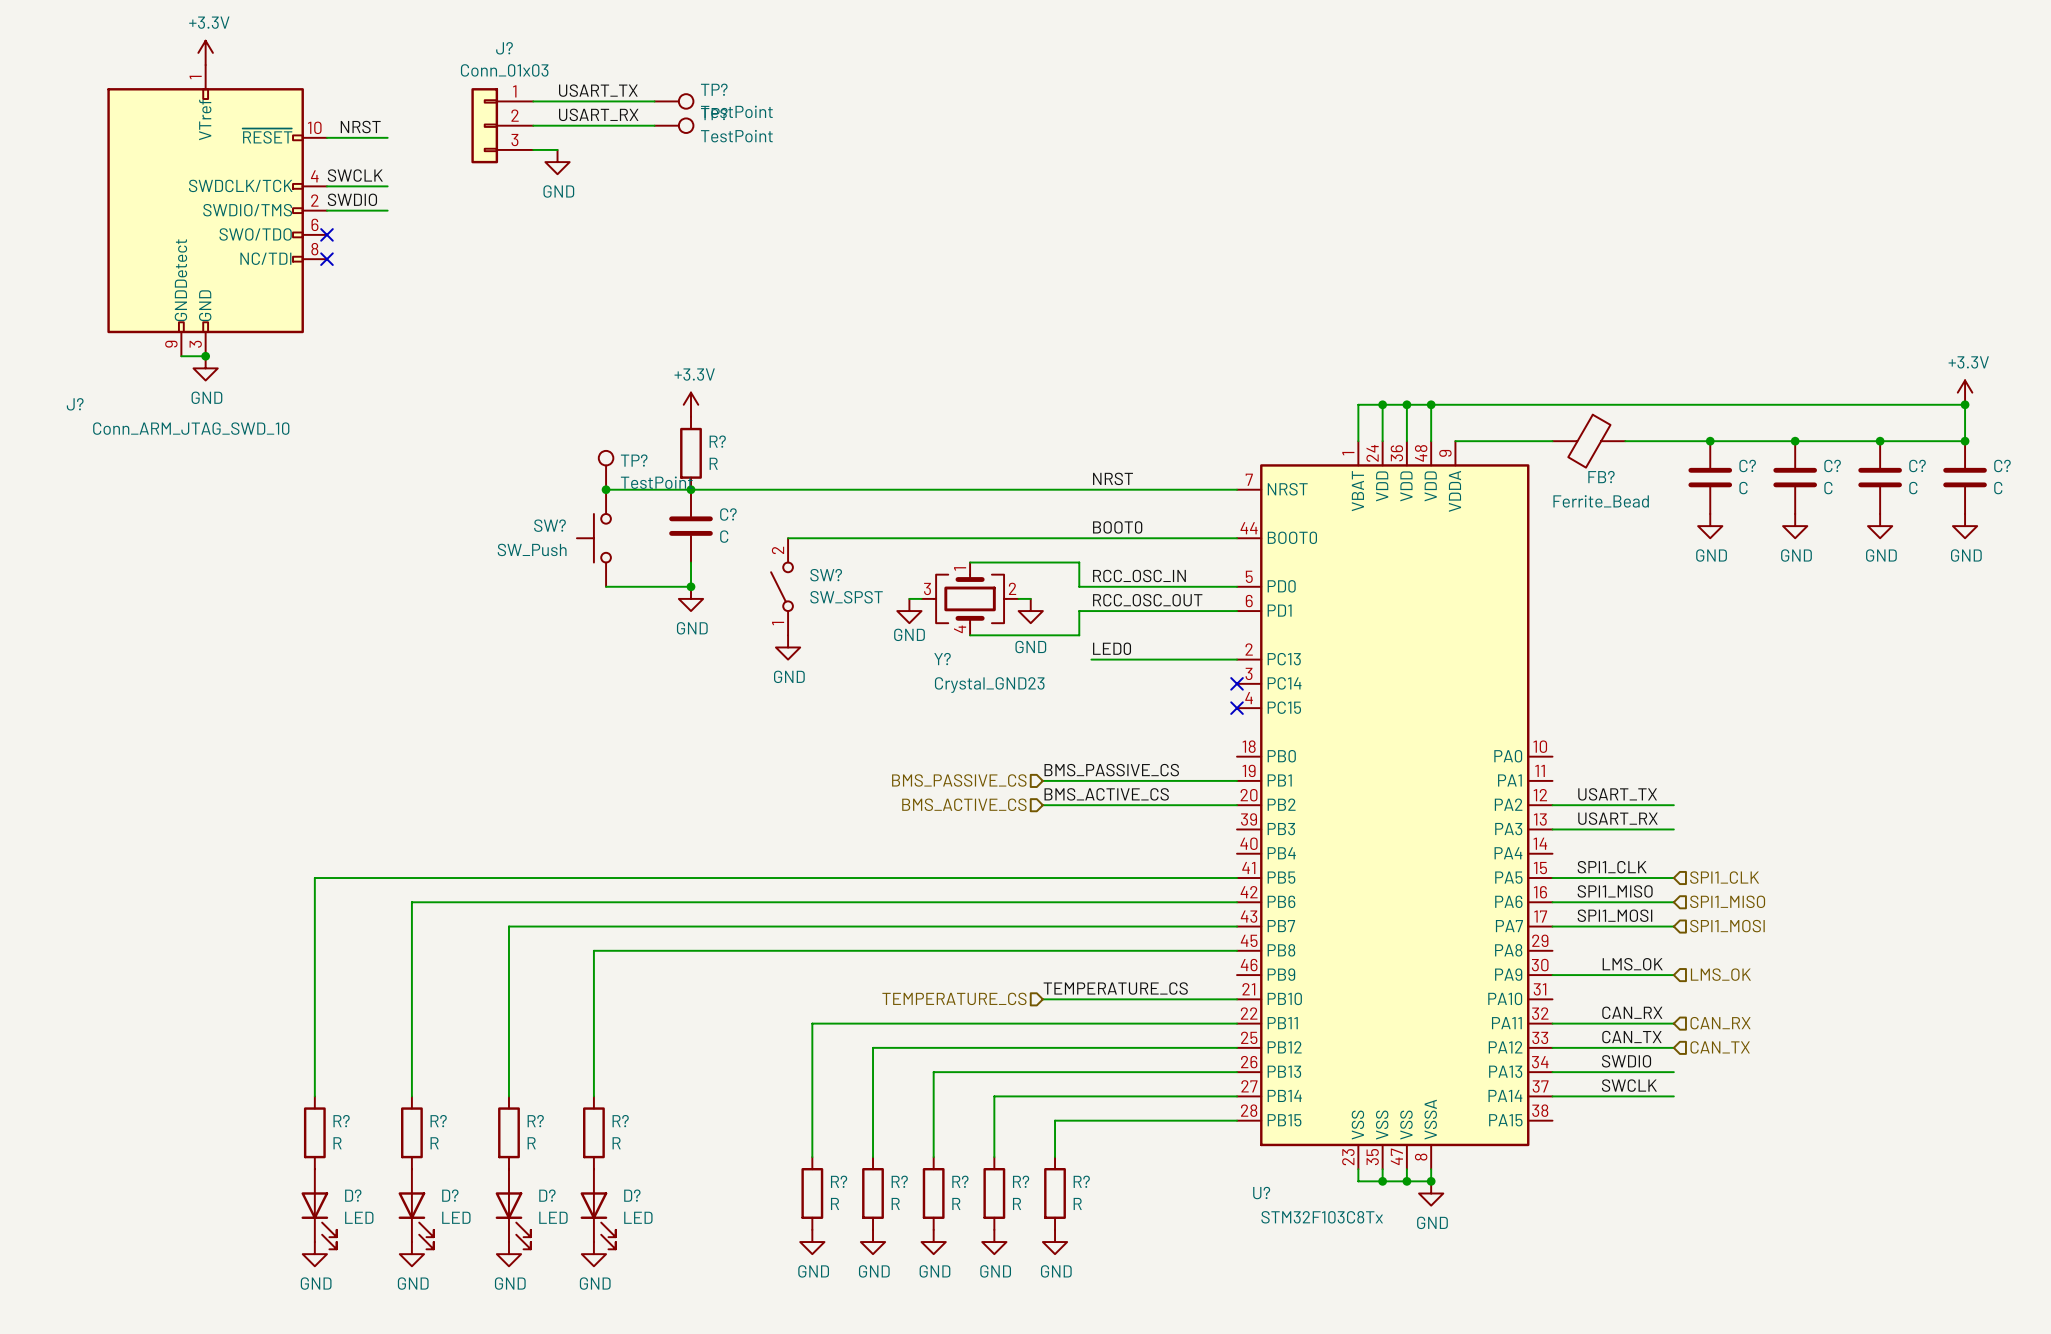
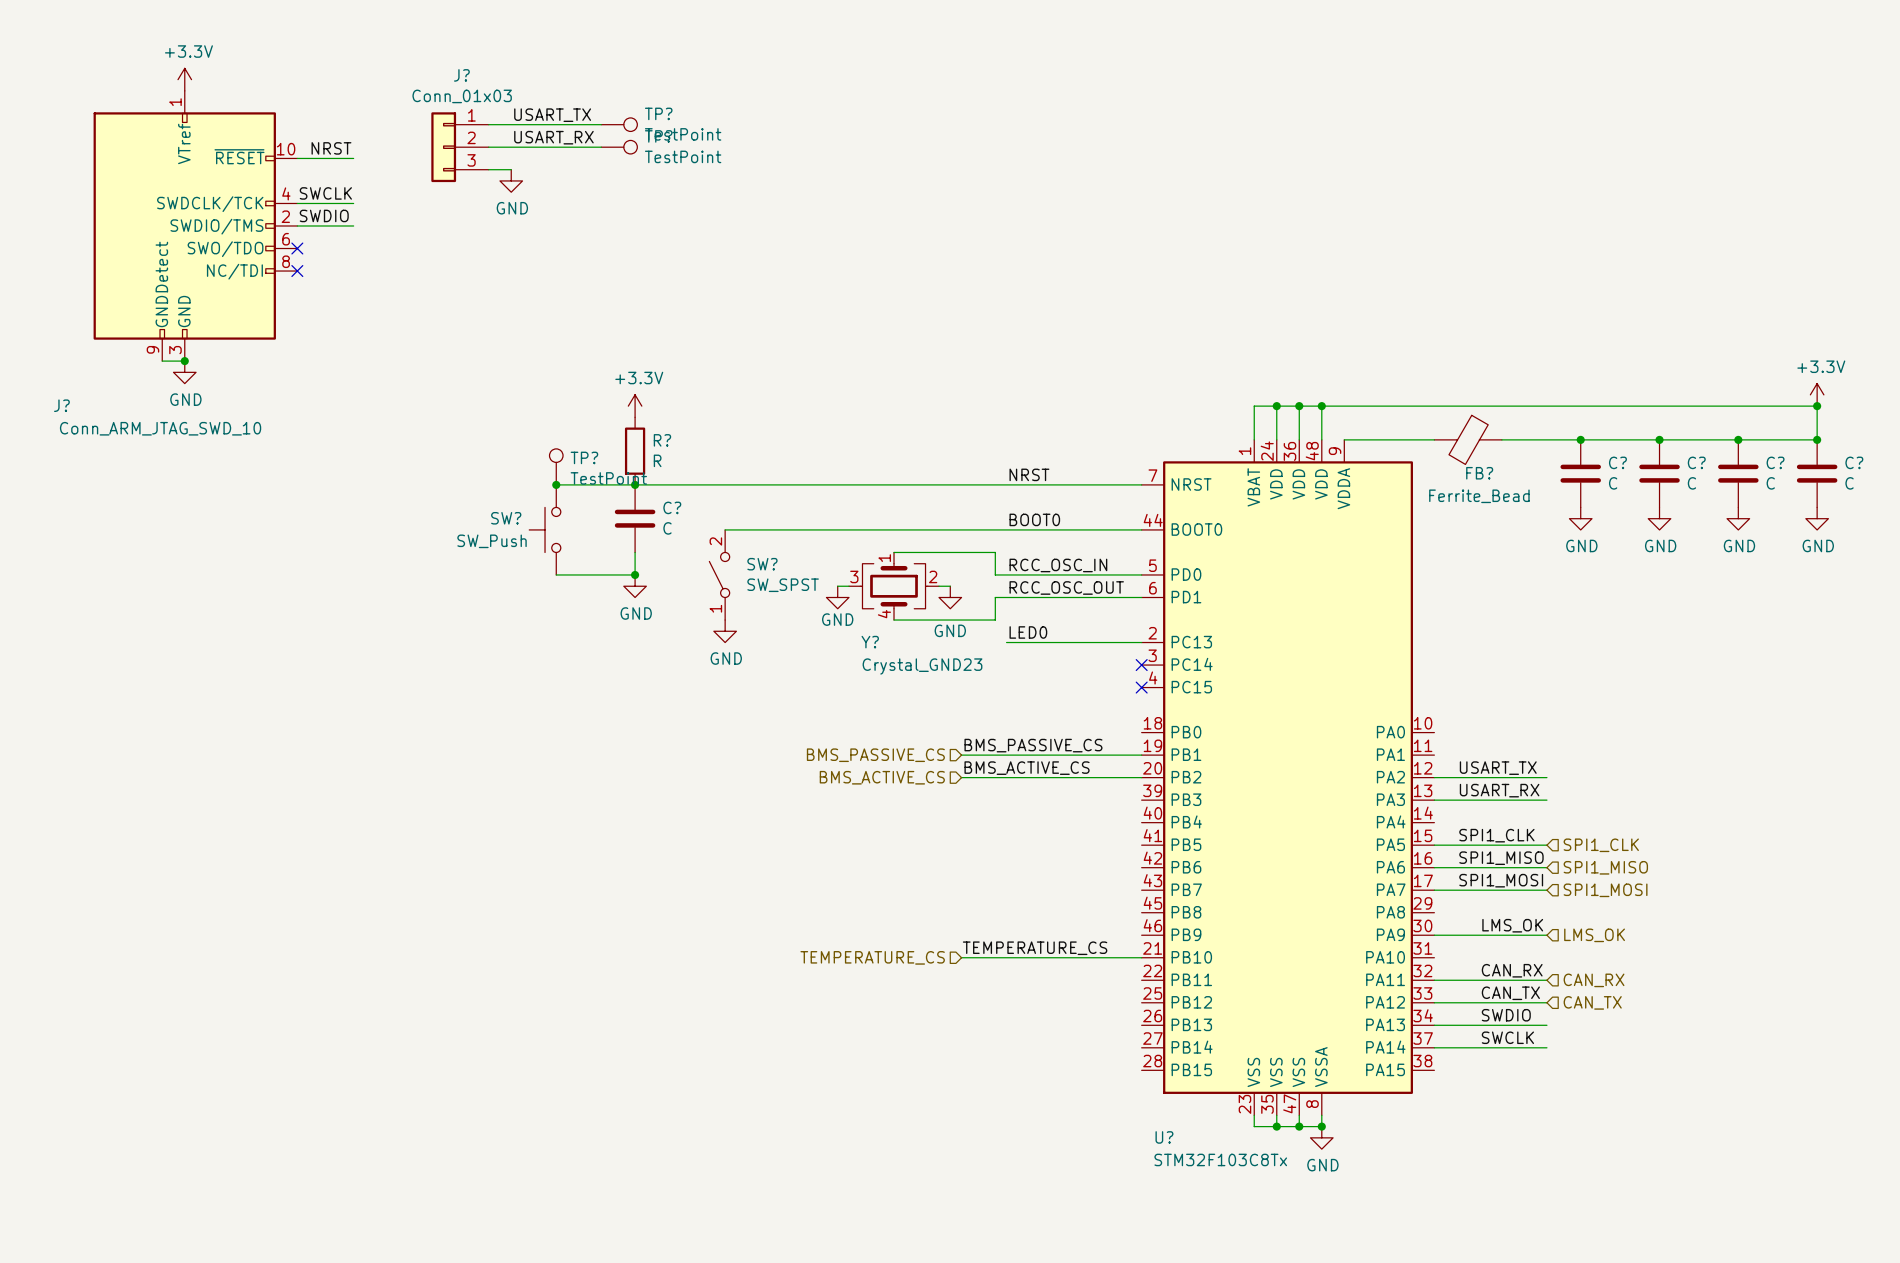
wire: (1237, 878) (314, 878) (314, 1096) -> none
wire: (1237, 902) (411, 902) (411, 1096) -> none
wire: (1237, 926) (508, 926) (508, 1096) -> none
wire: (1237, 950) (593, 950) (593, 1096) -> none
wire: (1237, 1023) (812, 1023) (812, 1157) -> none
wire: (1237, 1047) (873, 1047) (873, 1157) -> none
wire: (1237, 1072) (933, 1072) (933, 1157) -> none
wire: (1237, 1096) (994, 1096) (994, 1157) -> none
wire: (1237, 1120) (1055, 1120) (1055, 1157) -> none
R?: R (314, 1132) -> none
R?: R (411, 1132) -> none
R?: R (508, 1132) -> none
R?: R (593, 1132) -> none
R?: R (812, 1193) -> none
R?: R (873, 1193) -> none
R?: R (933, 1193) -> none
R?: R (994, 1193) -> none
R?: R (1055, 1193) -> none
D?: LED (319, 1209) -> none
D?: LED (416, 1209) -> none
D?: LED (513, 1209) -> none
D?: LED (598, 1209) -> none
power symbol: GND (812, 1242) -> none
power symbol: GND (873, 1242) -> none
power symbol: GND (933, 1242) -> none
power symbol: GND (994, 1242) -> none
power symbol: GND (1055, 1242) -> none
power symbol: GND (314, 1254) -> none
power symbol: GND (411, 1254) -> none
power symbol: GND (508, 1254) -> none
power symbol: GND (593, 1254) -> none

